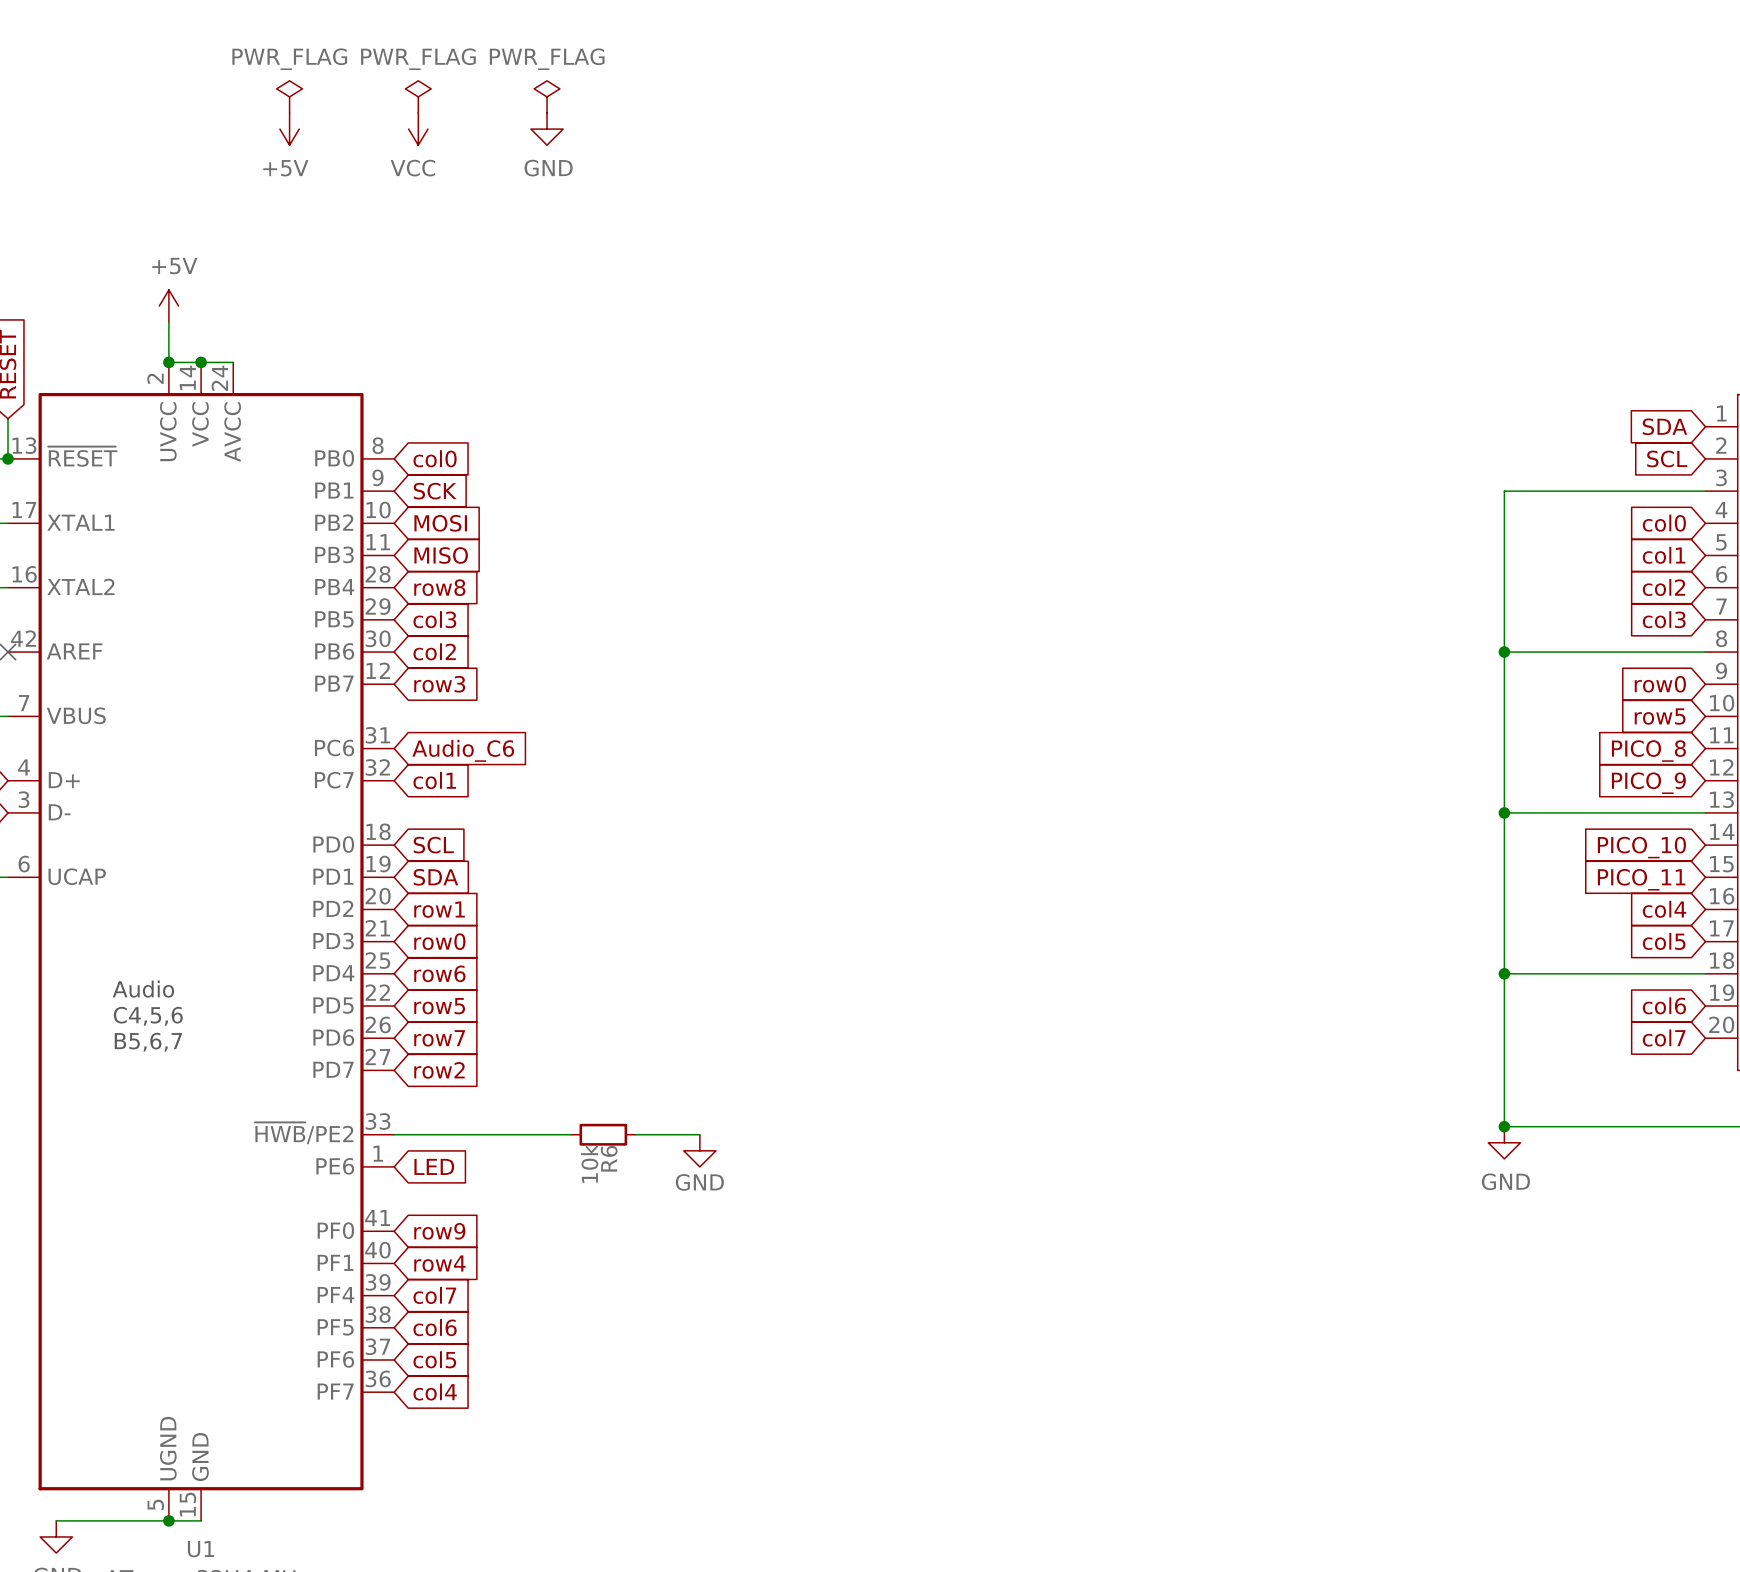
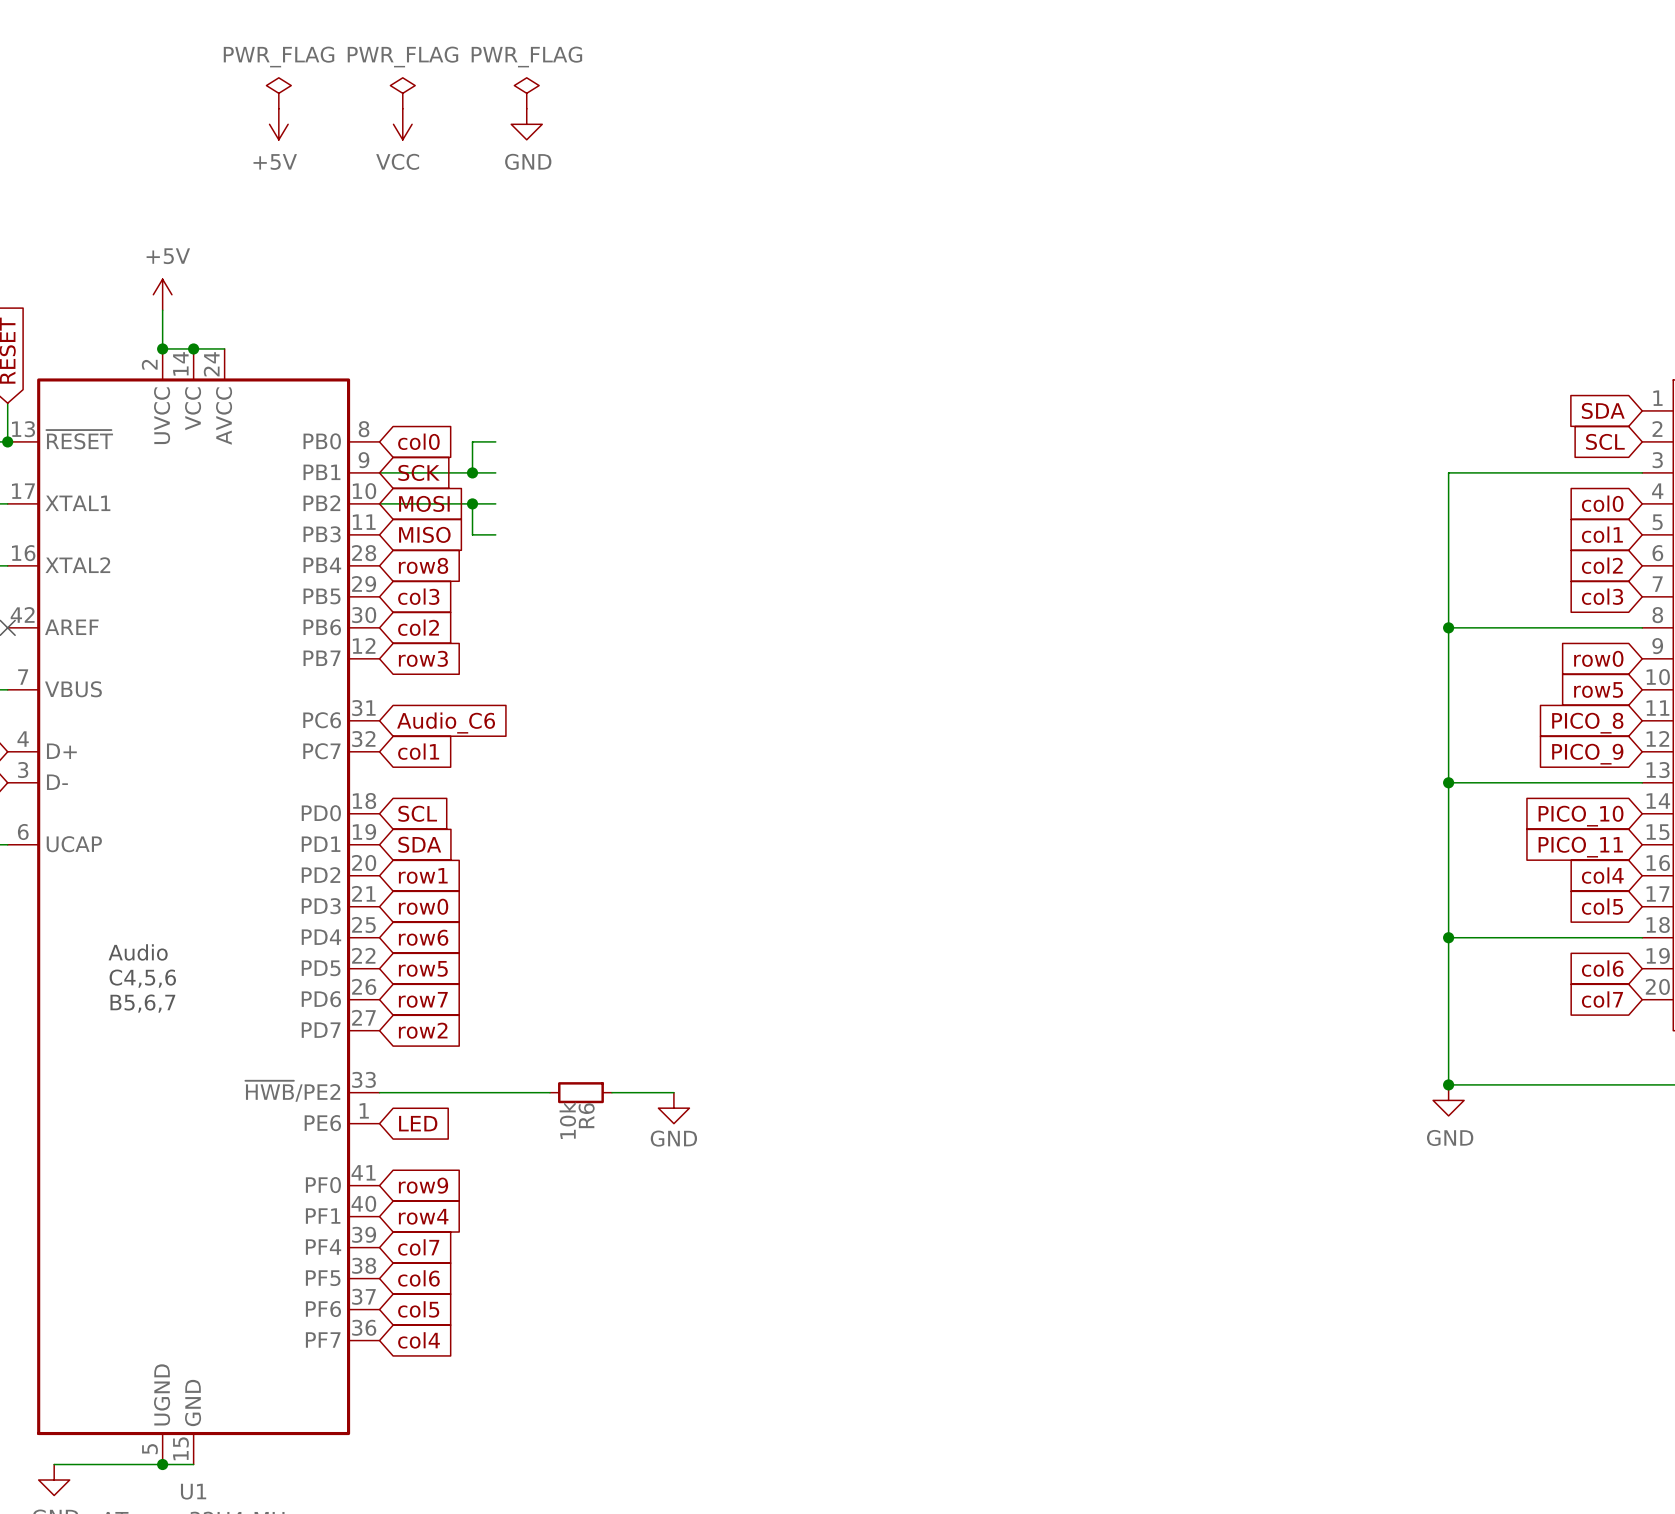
wire: none -> (495, 441) (472, 441) (472, 472)
wire: none -> (379, 472) (495, 472)
junction: none -> (472, 472)
wire: none -> (379, 503) (495, 503)
wire: none -> (472, 503) (472, 534) (495, 534)
junction: none -> (472, 503)

